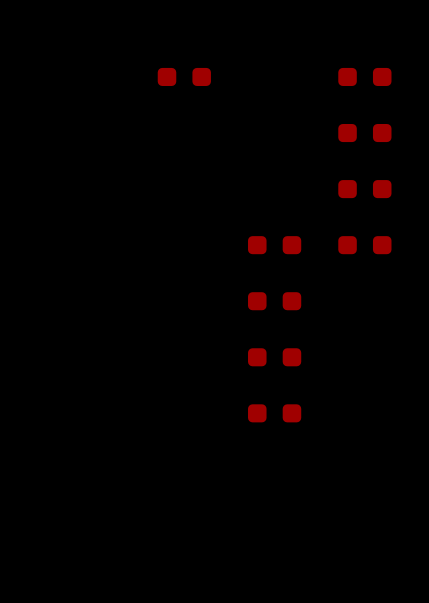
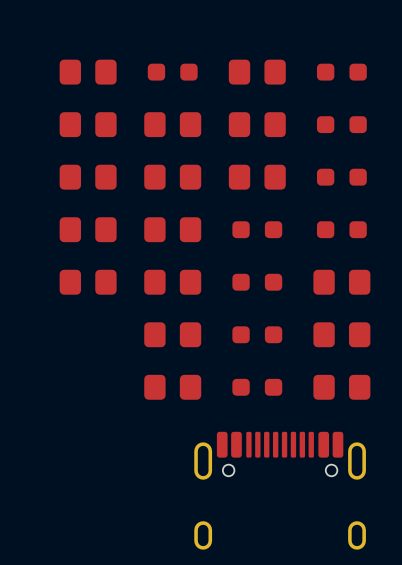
part: none -> (88, 72)
part: none -> (257, 72)
part: none -> (88, 124)
part: none -> (172, 124)
part: none -> (257, 124)
part: none -> (88, 177)
part: none -> (172, 177)
part: none -> (257, 177)
part: none -> (88, 229)
part: none -> (172, 229)
part: none -> (88, 282)
part: none -> (172, 282)
part: none -> (341, 282)
part: none -> (172, 334)
part: none -> (341, 334)
part: none -> (172, 387)
part: none -> (341, 387)
part: none -> (280, 490)

